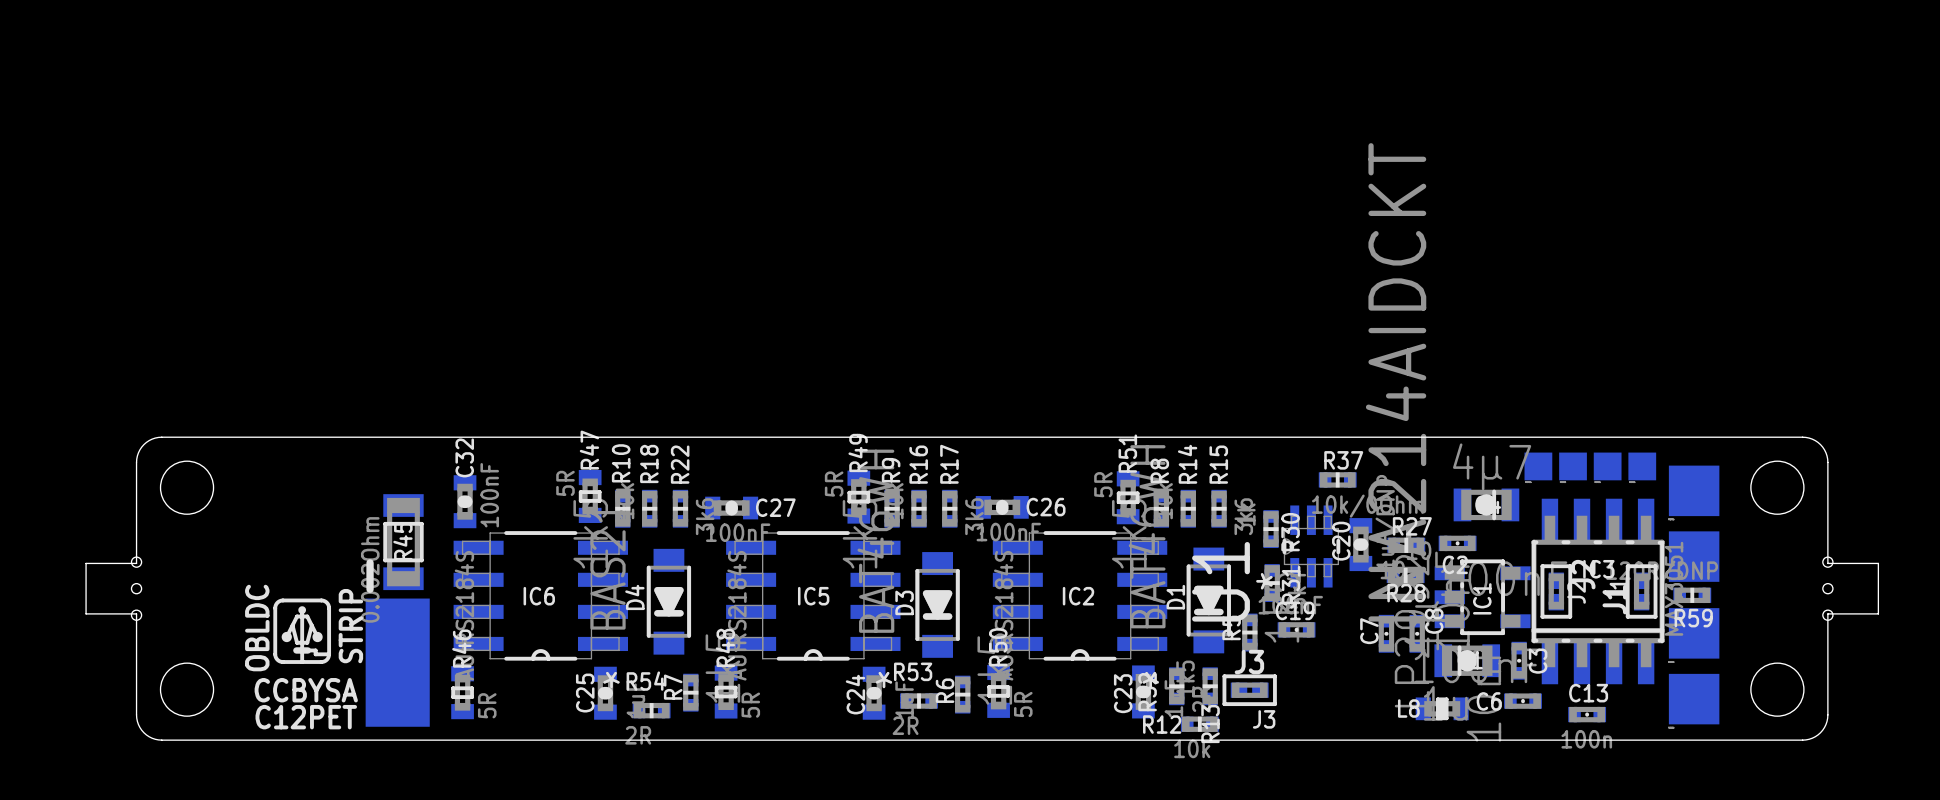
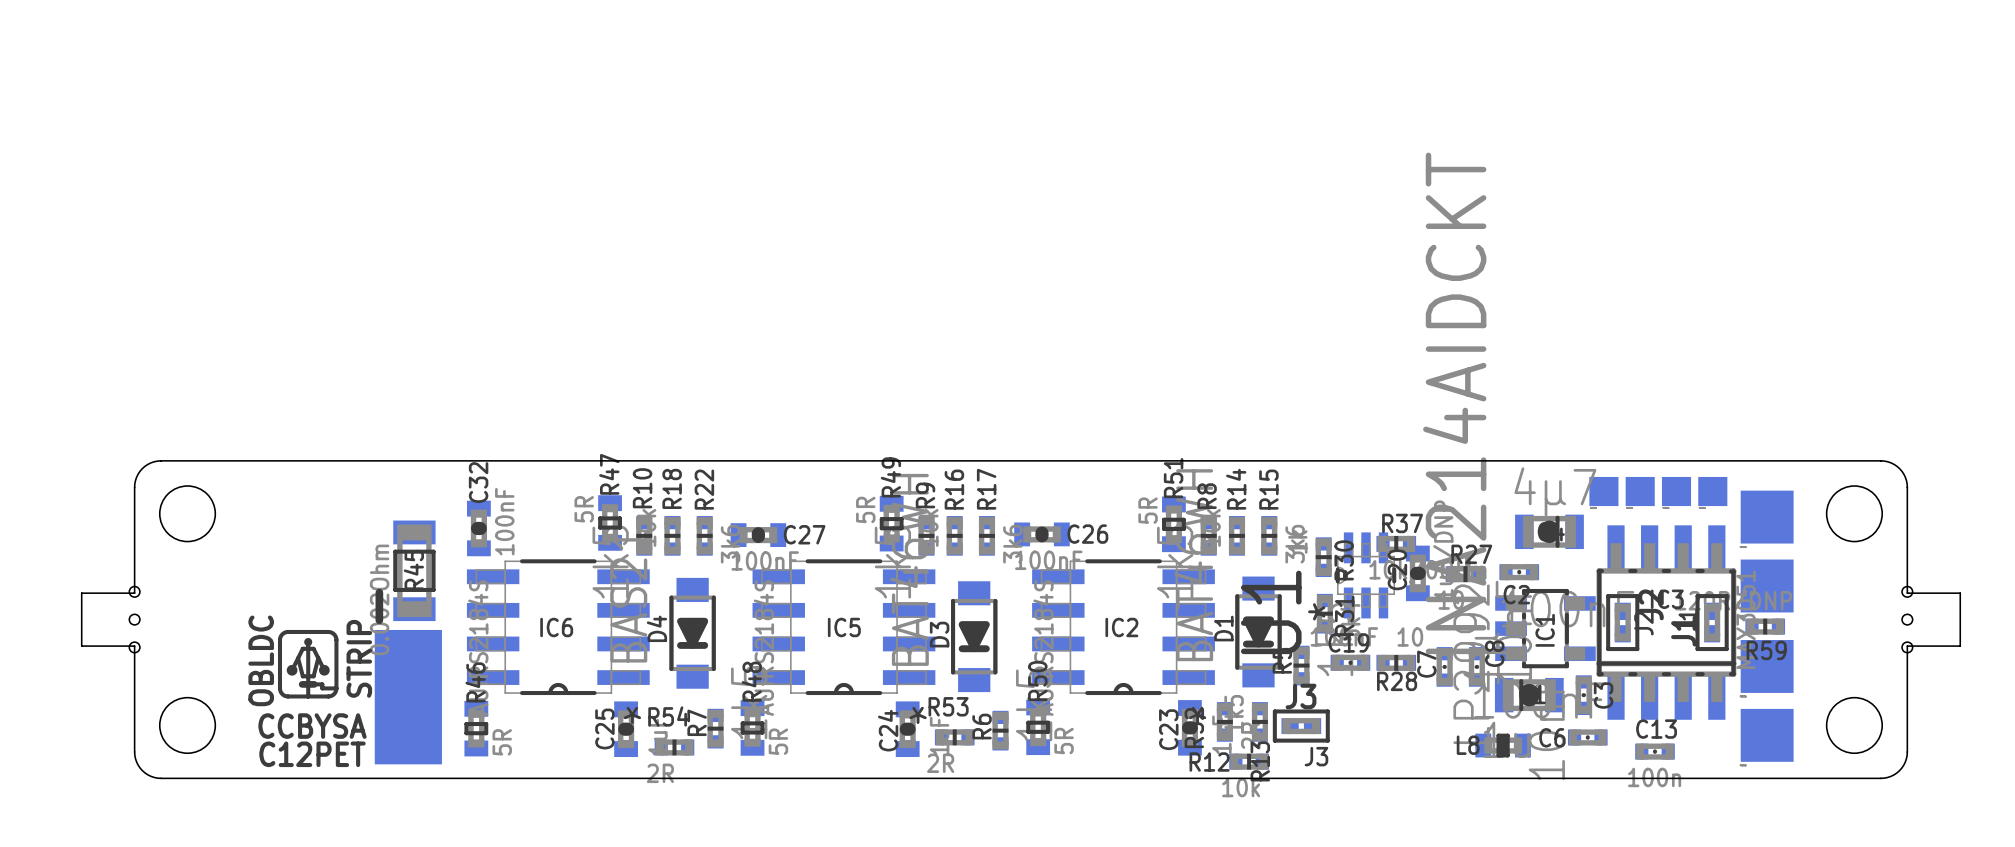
R37 position: (1337, 479) -> (1396, 543)
R28 position: (1405, 575) -> (1396, 662)

